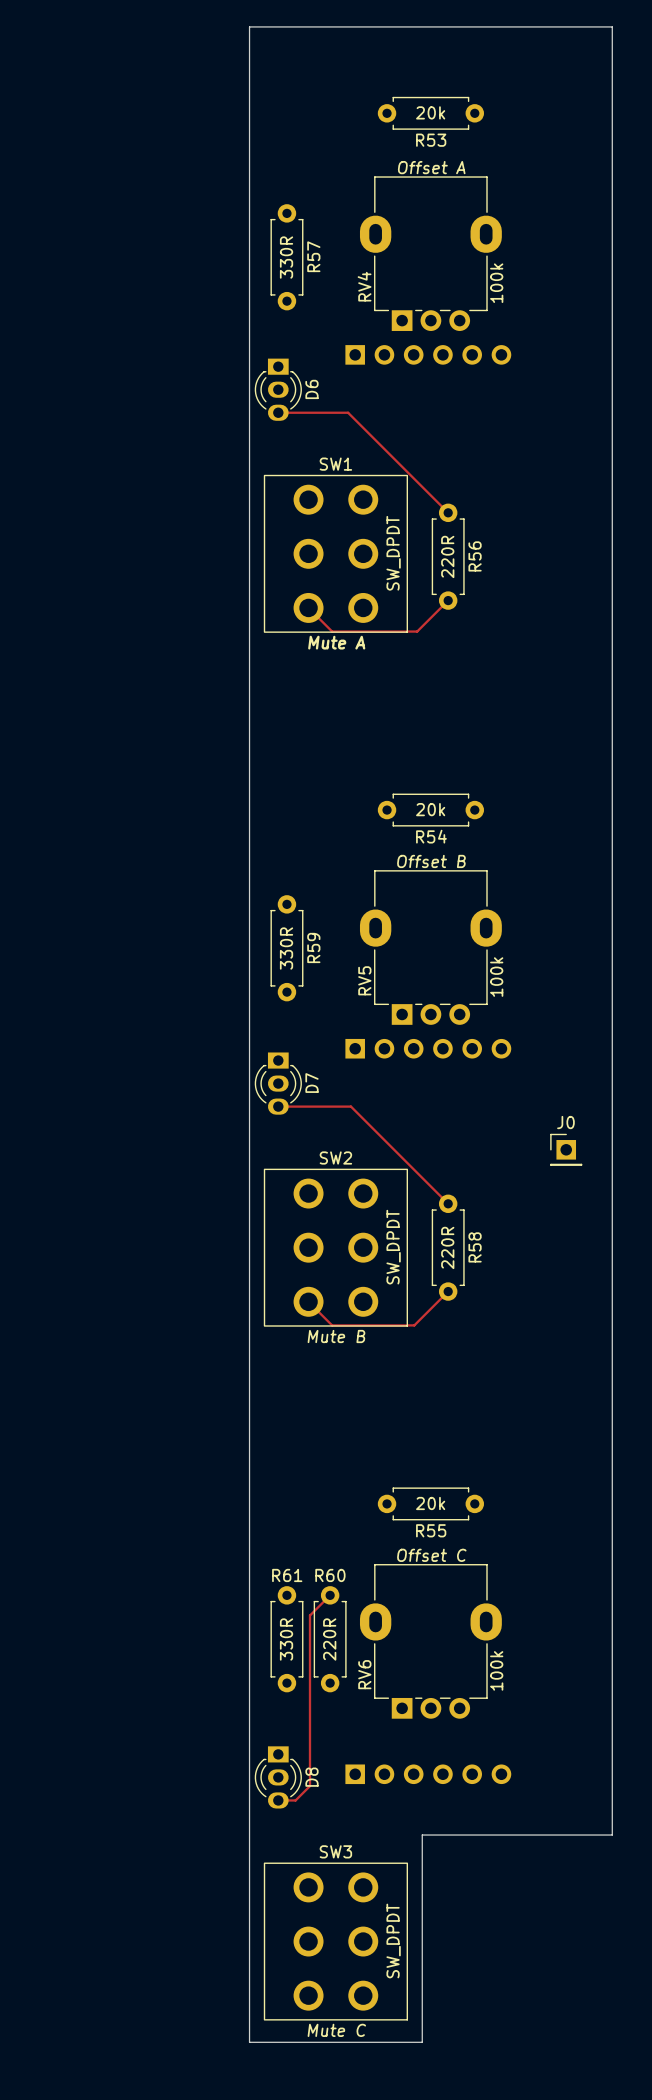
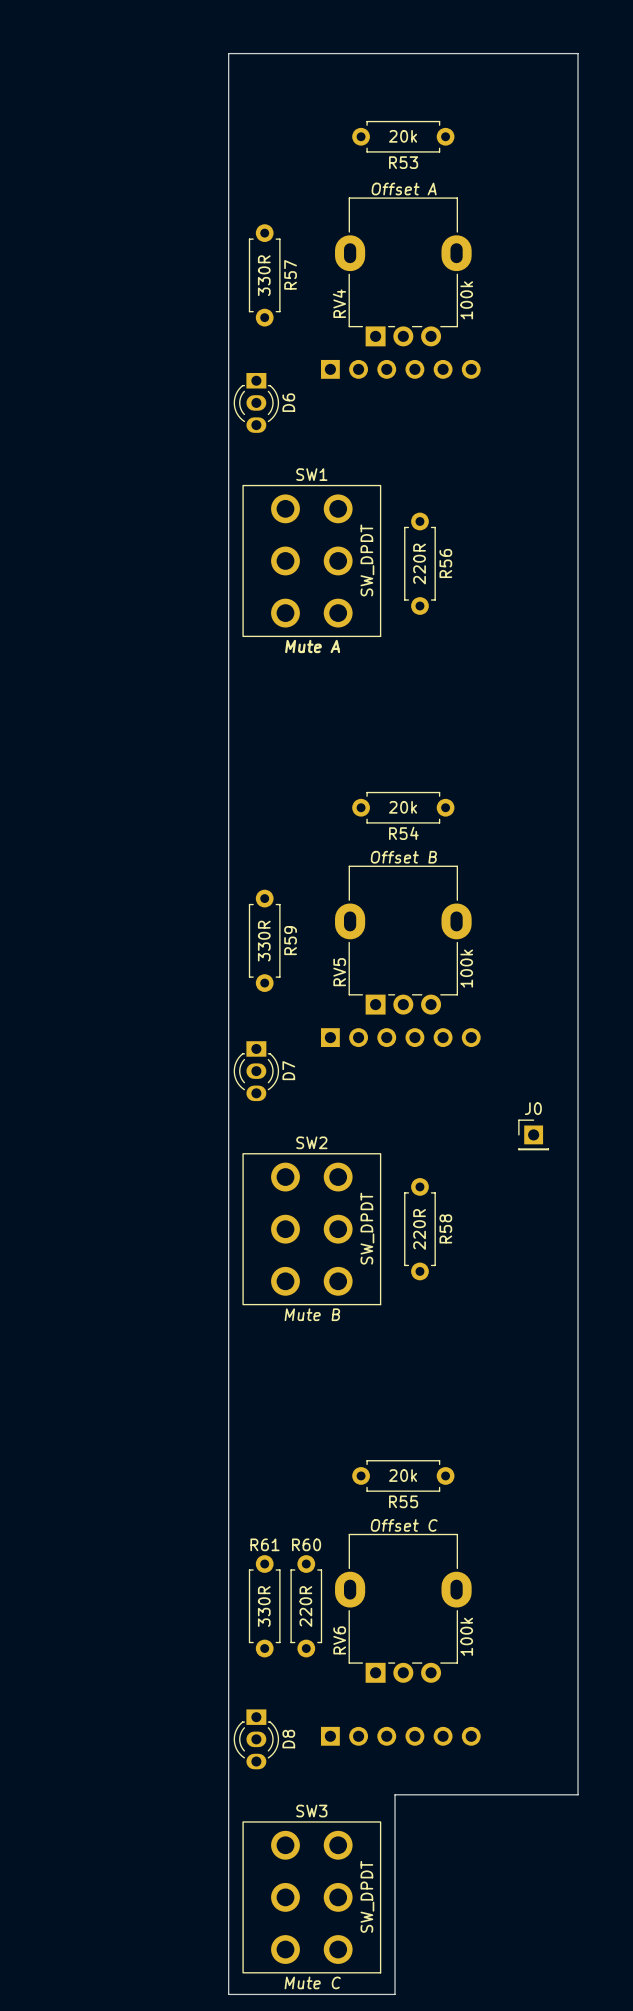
track: (278, 412) (348, 412) (448, 512) -> none
track: (448, 600) (417, 631) (332, 631) (308, 607) -> none
track: (278, 1106) (350, 1106) (448, 1203) -> none
track: (448, 1291) (414, 1325) (332, 1325) (308, 1301) -> none
track: (330, 1595) (309, 1615) (309, 1786) (295, 1800) (278, 1800) -> none

